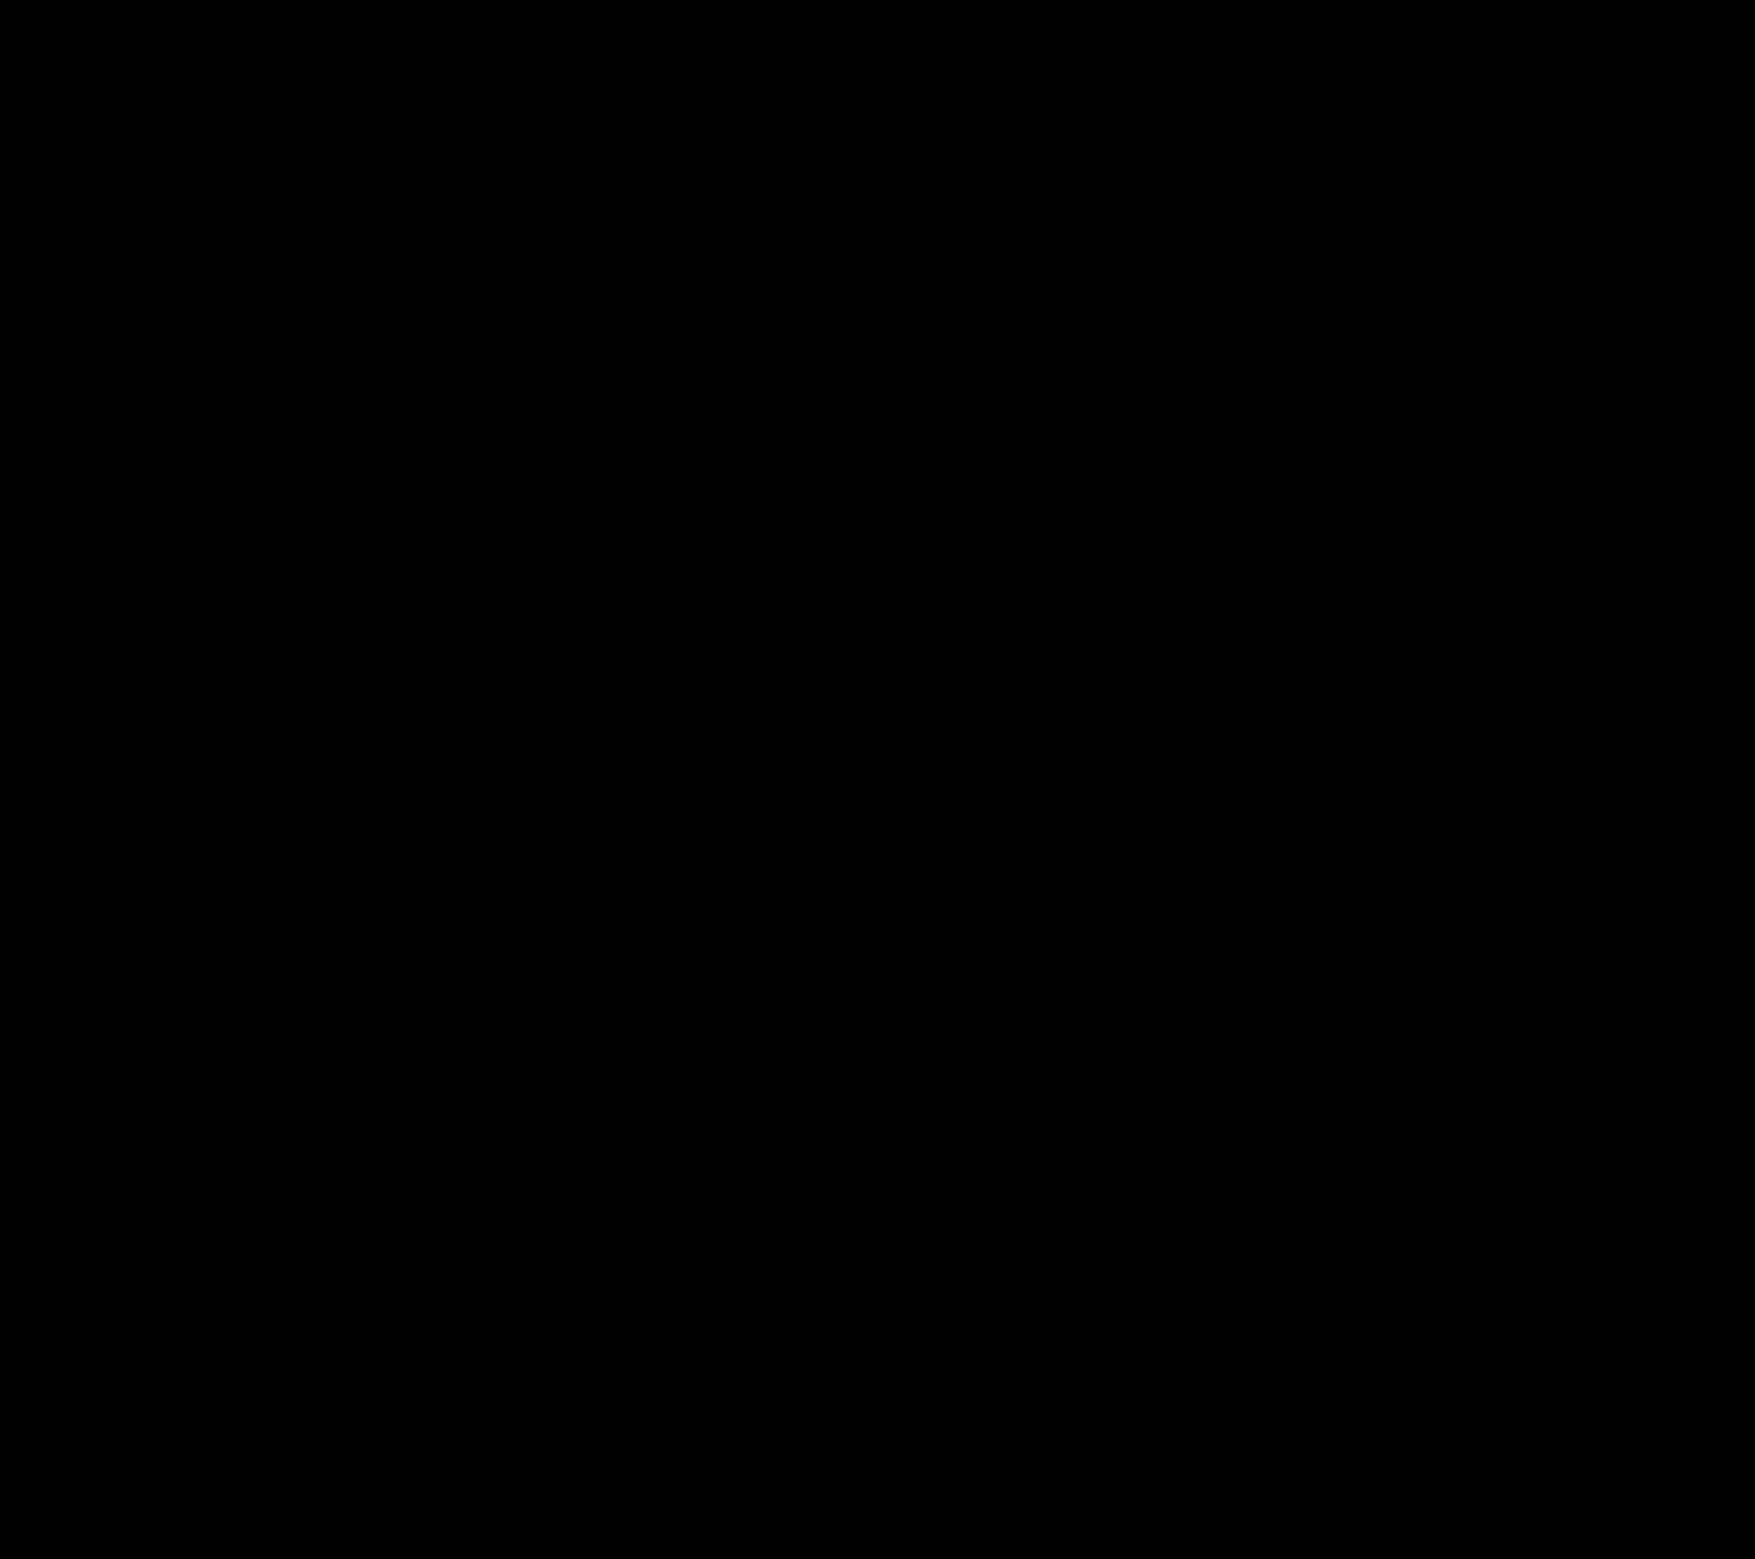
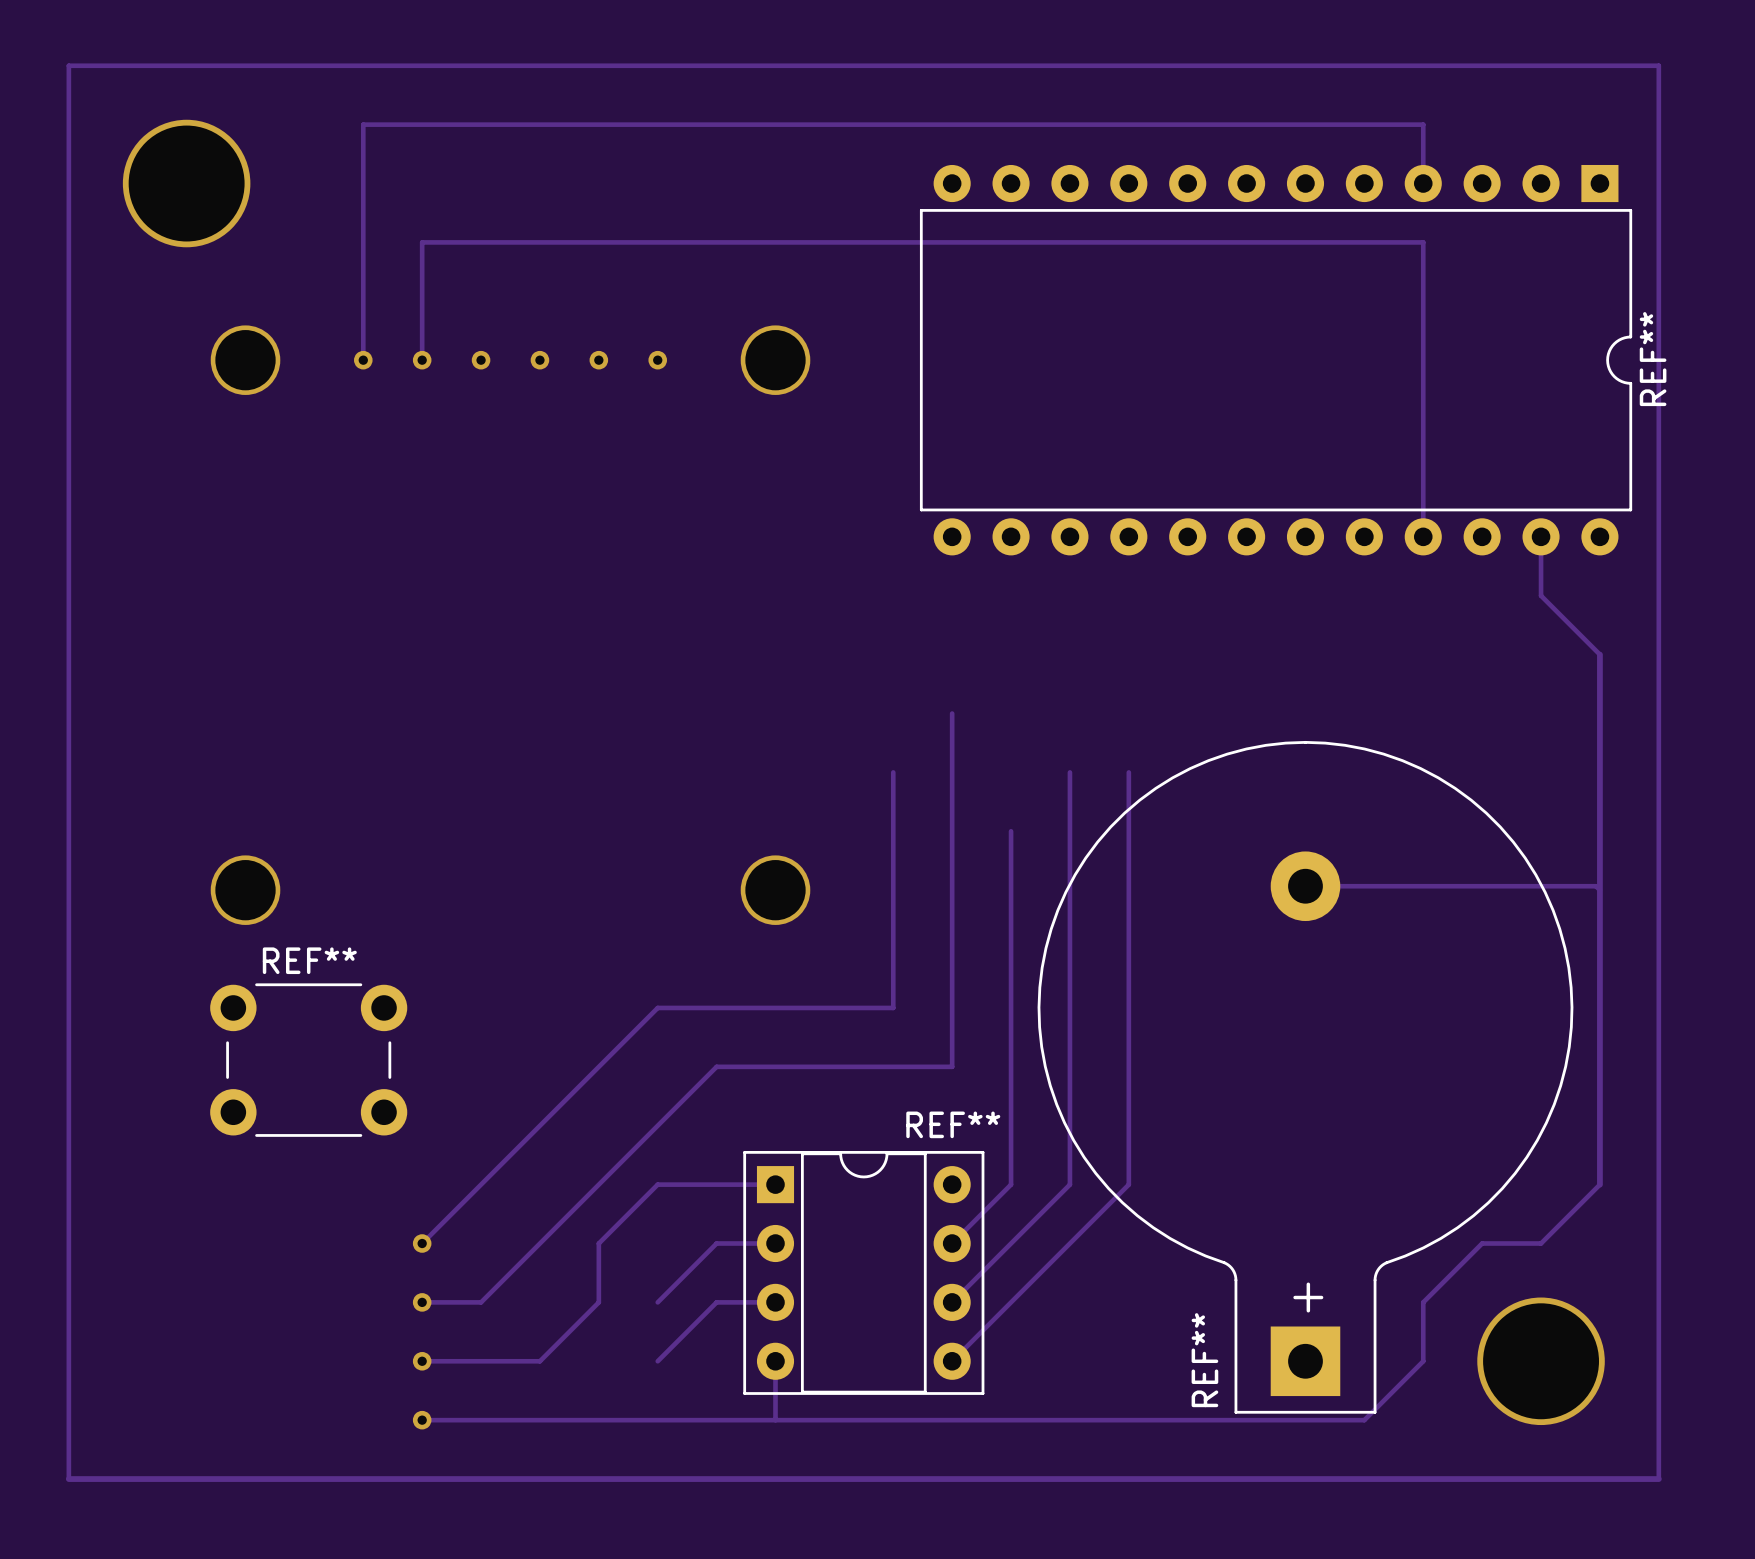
track: none -> (68, 65) (68, 1479) (1658, 1479) (1658, 65) (68, 65)
via: none -> (186, 183)
track: none -> (1423, 183) (1423, 124) (363, 124) (363, 360)
via: none -> (245, 360)
via: none -> (363, 360)
track: none -> (422, 360) (422, 242) (1423, 242) (1423, 536)
via: none -> (422, 360)
via: none -> (481, 360)
via: none -> (539, 360)
via: none -> (598, 360)
via: none -> (657, 360)
via: none -> (775, 360)
REF**: none -> (1276, 360)
track: none -> (1541, 536) (1541, 595) (1599, 654) (1599, 1184) (1541, 1243) (1482, 1243) (1423, 1302) (1423, 1361) (1364, 1420) (422, 1420)
track: none -> (952, 713) (952, 1066) (716, 1066) (481, 1302) (422, 1302)
track: none -> (893, 772) (893, 1007) (657, 1007) (422, 1243)
track: none -> (1069, 772) (1069, 1184) (952, 1302)
track: none -> (1128, 772) (1128, 1184) (952, 1361)
track: none -> (1011, 831) (1011, 1184) (952, 1243)
track: none -> (1305, 886) (1595, 886) (1599, 890)
via: none -> (245, 890)
via: none -> (775, 890)
REF**: none -> (308, 1060)
REF**: none -> (1305, 1077)
track: none -> (775, 1184) (657, 1184) (598, 1243) (598, 1302) (539, 1361) (422, 1361)
via: none -> (422, 1243)
track: none -> (775, 1243) (716, 1243) (657, 1302)
REF**: none -> (863, 1272)
via: none -> (422, 1302)
track: none -> (775, 1302) (716, 1302) (657, 1361)
via: none -> (422, 1361)
track: none -> (775, 1361) (775, 1420)
via: none -> (1541, 1361)
via: none -> (422, 1420)

